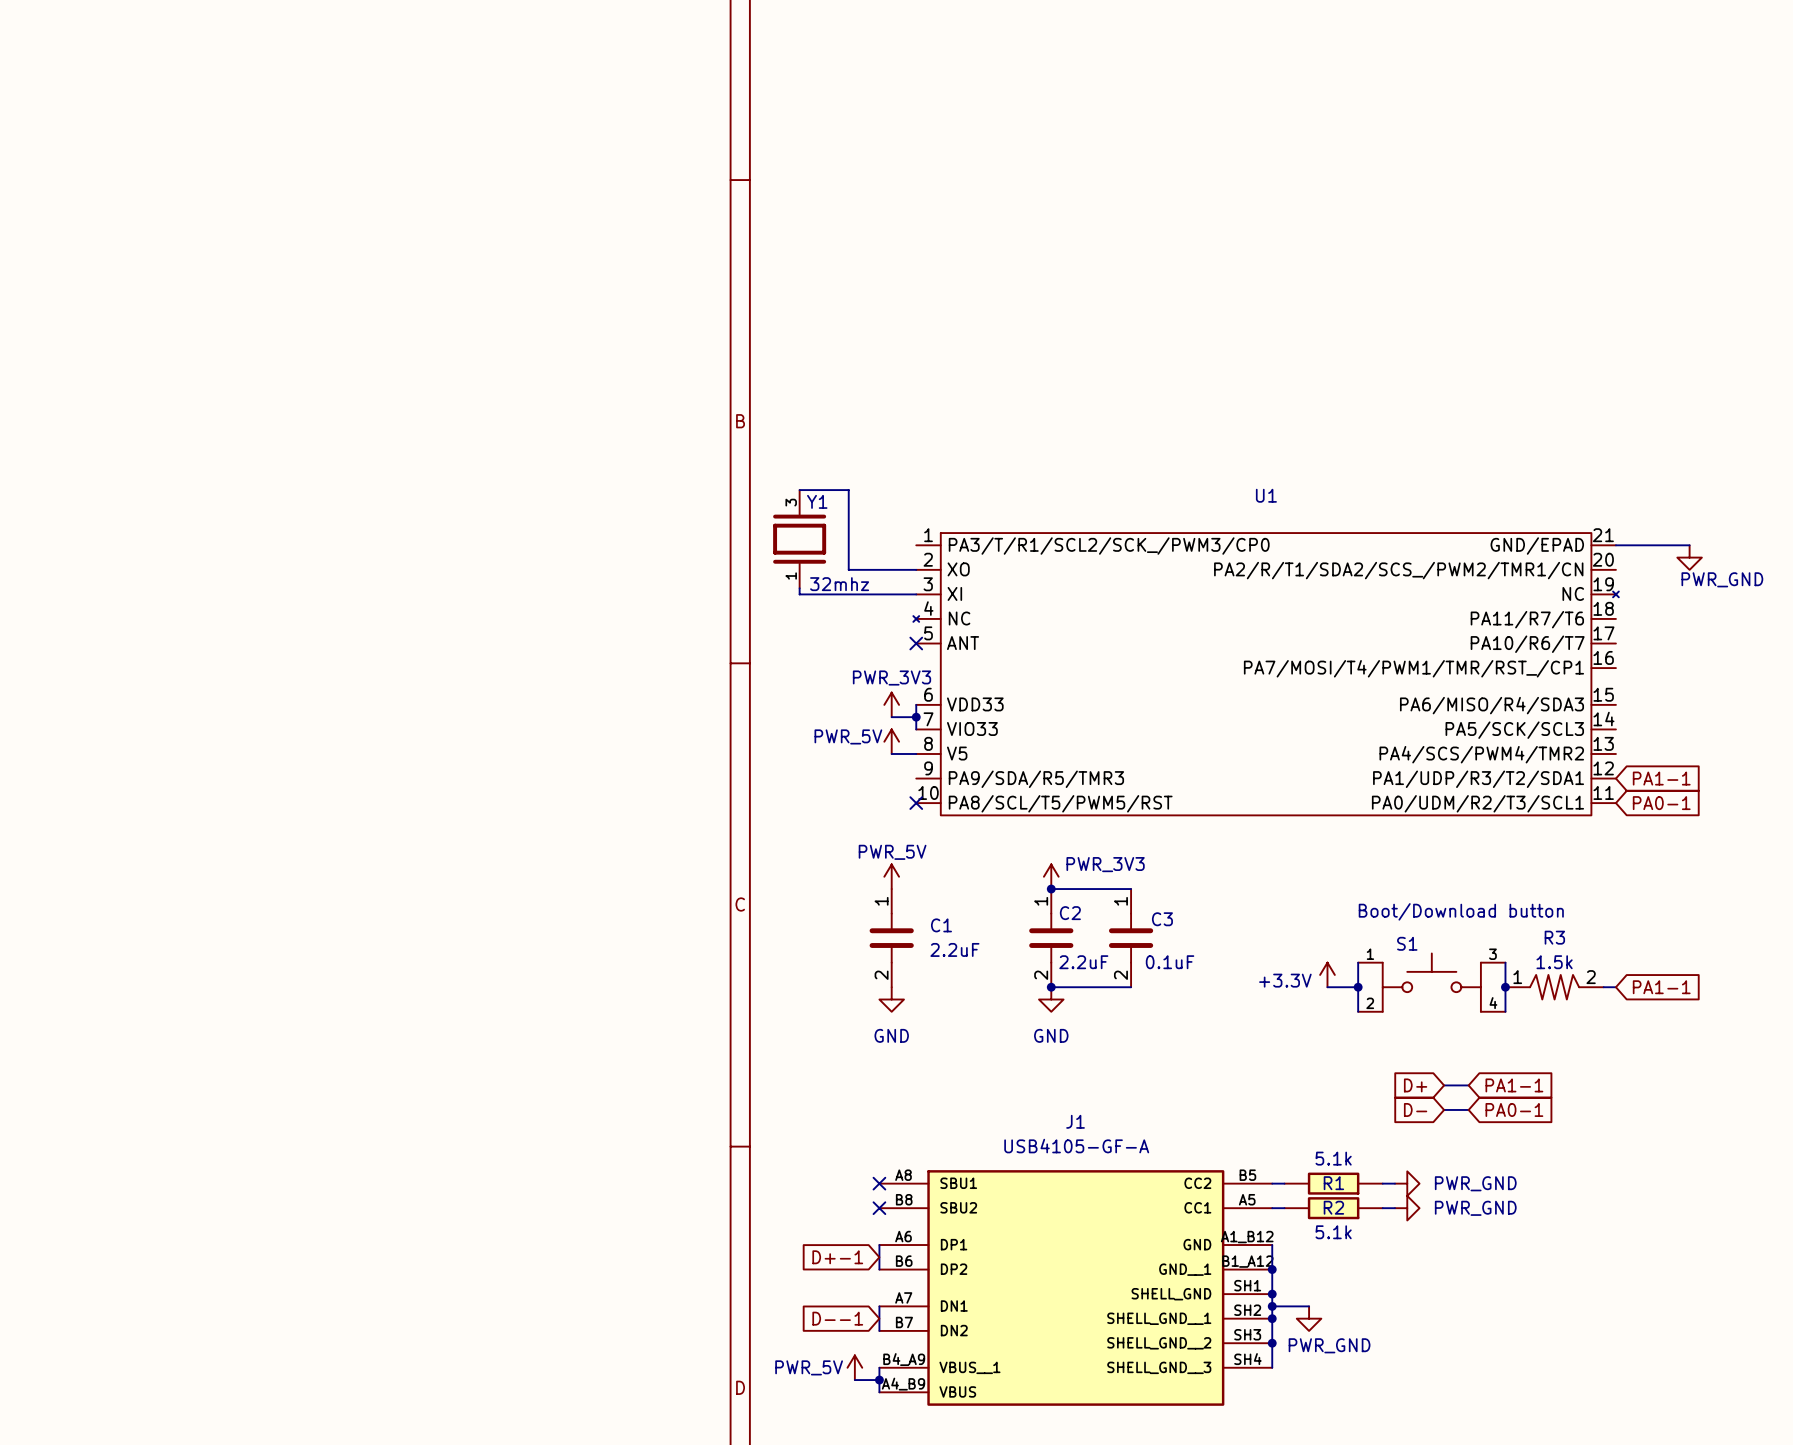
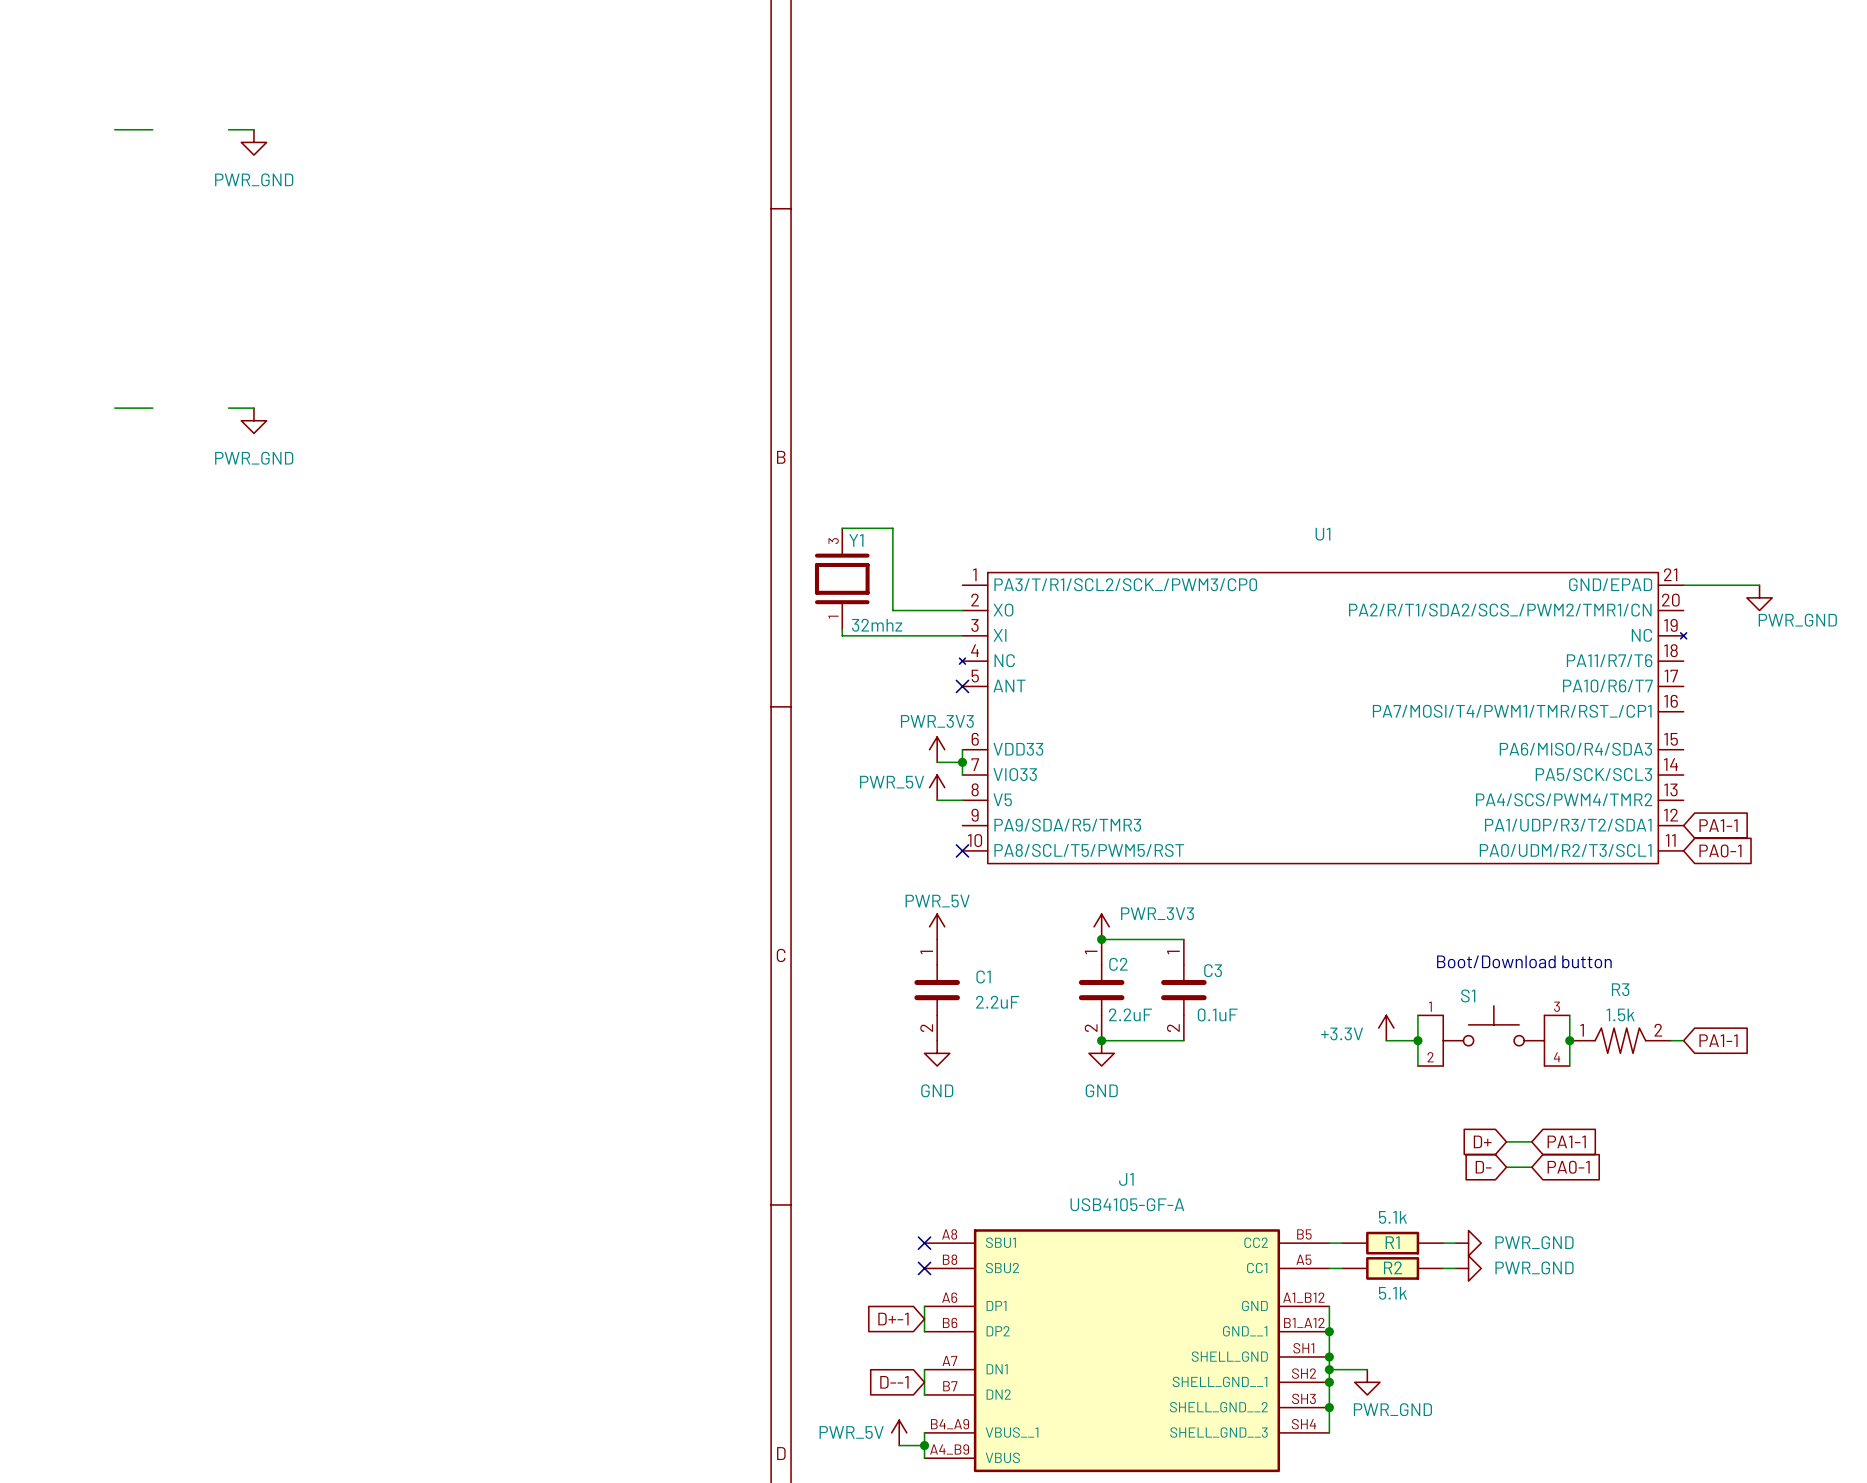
wire: none -> (114, 129) (152, 129)
wire: none -> (228, 129) (253, 129)
power symbol: none -> PWR_GND (253, 142)
wire: none -> (114, 408) (152, 408)
wire: none -> (228, 408) (253, 408)
power symbol: none -> PWR_GND (253, 420)

